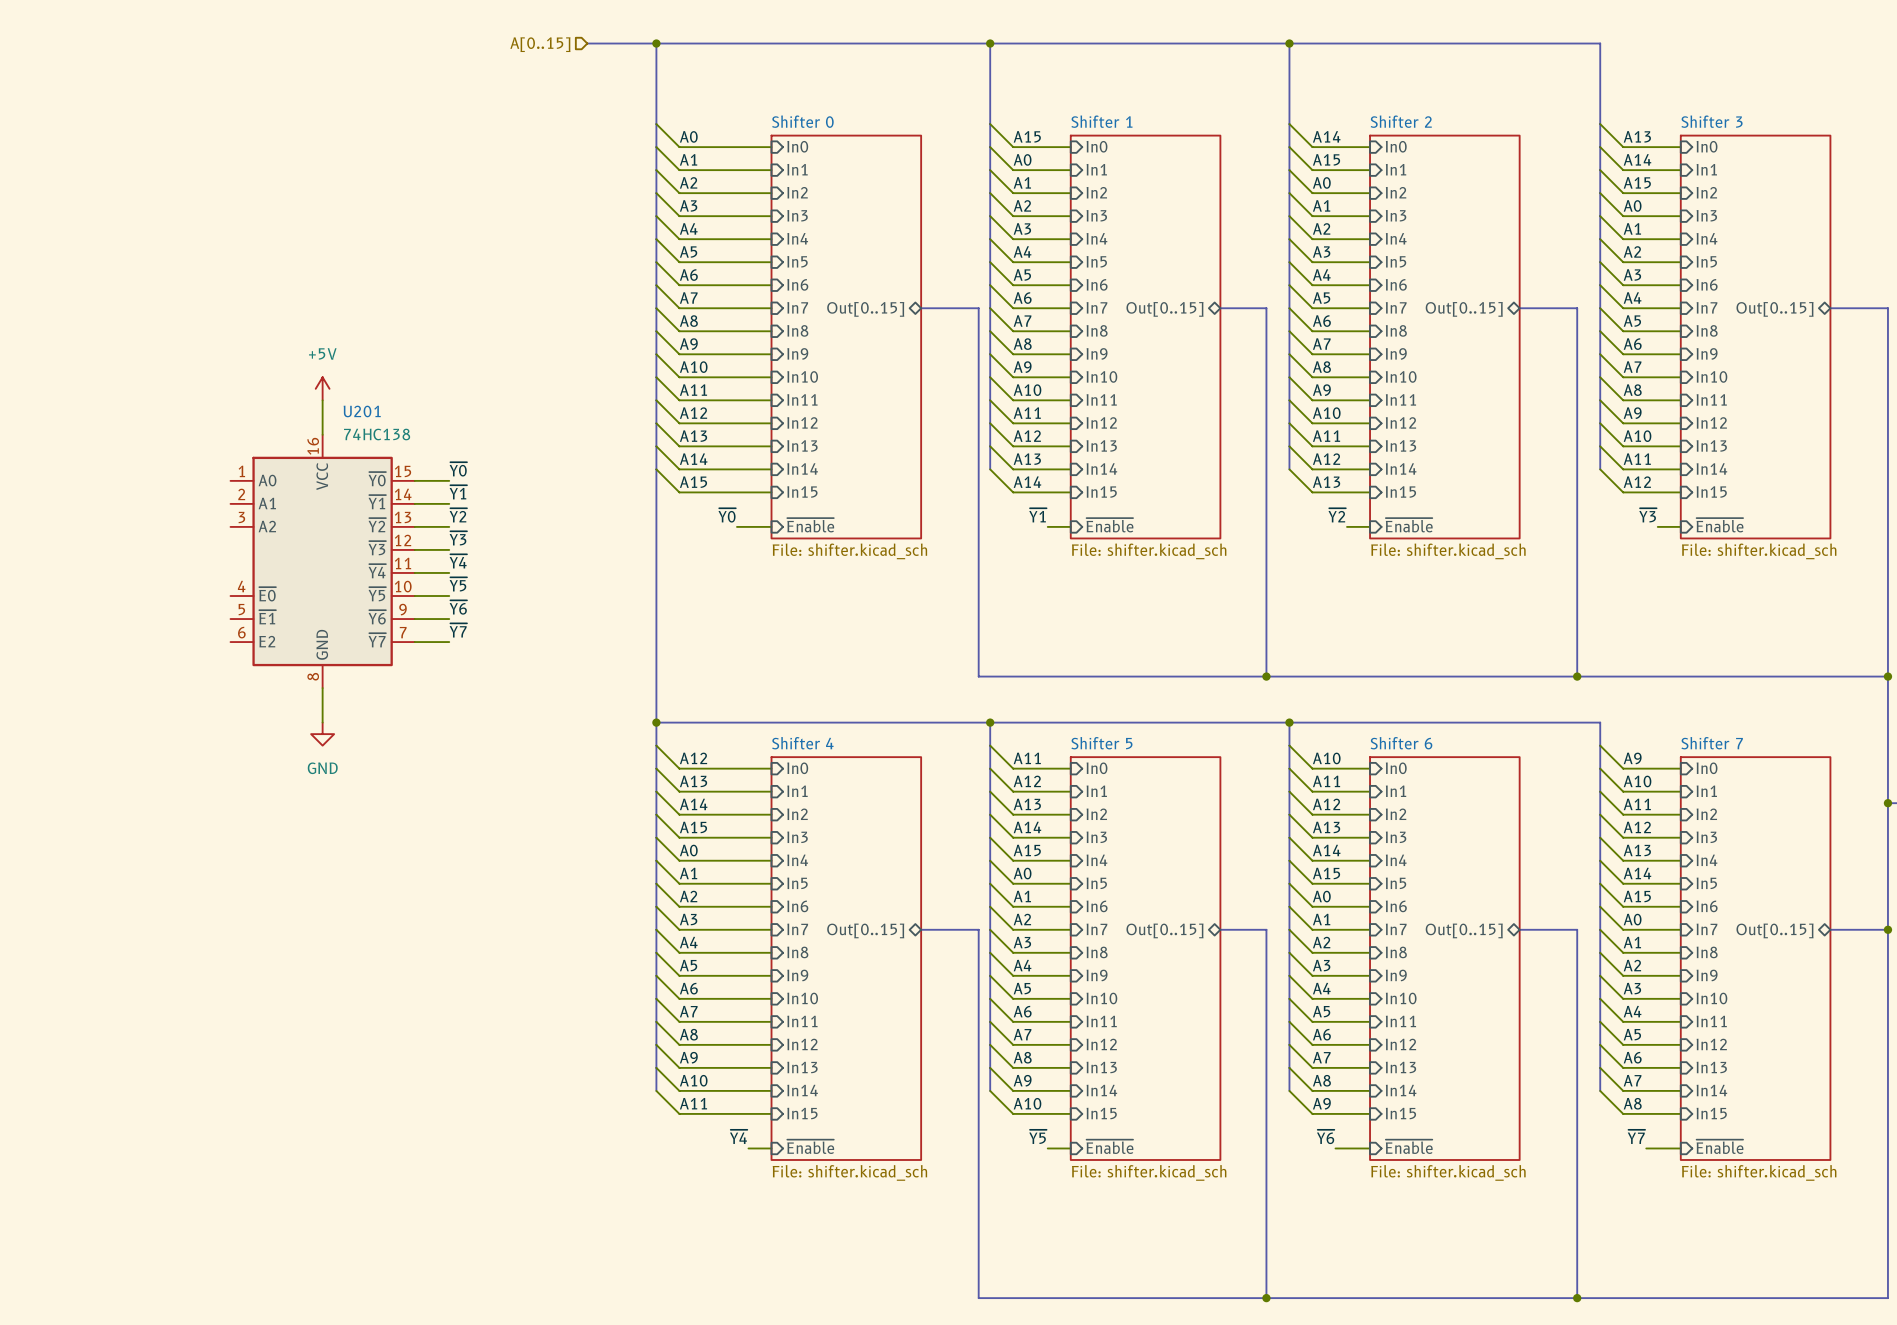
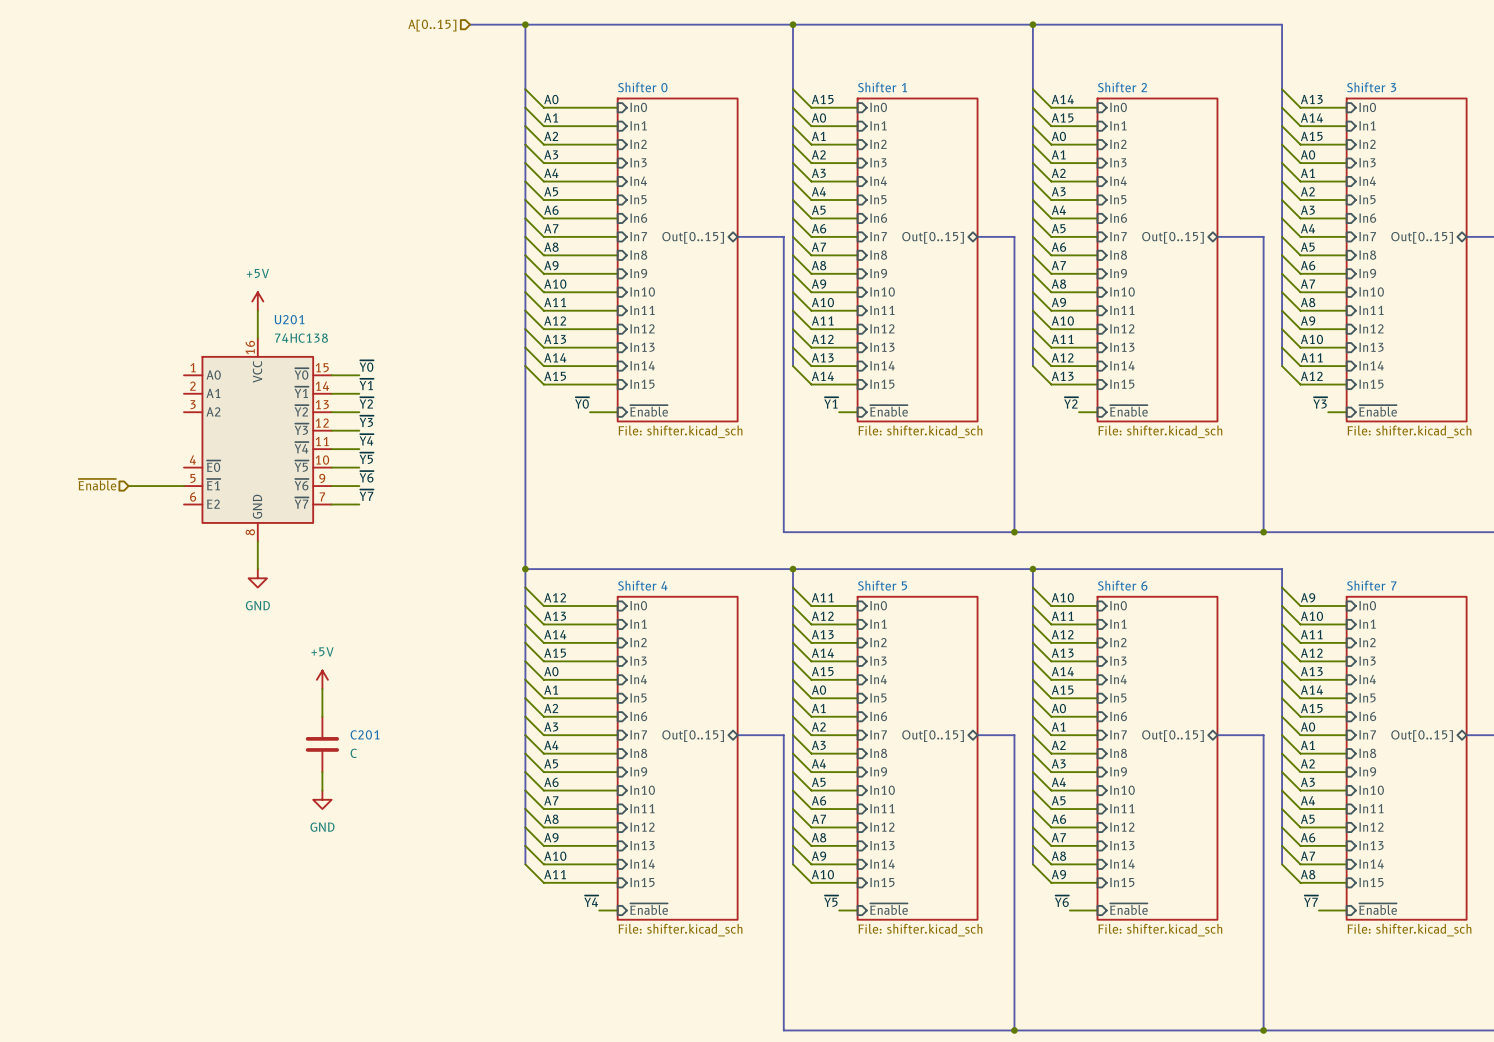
hierarchical label: none -> ~{Enable} (97, 484)
wire: none -> (128, 486) (183, 486)
power symbol: none -> +5V (322, 679)
wire: none -> (322, 689) (322, 716)
C201: none -> C (322, 744)
wire: none -> (322, 772) (322, 790)
power symbol: none -> GND (322, 799)

